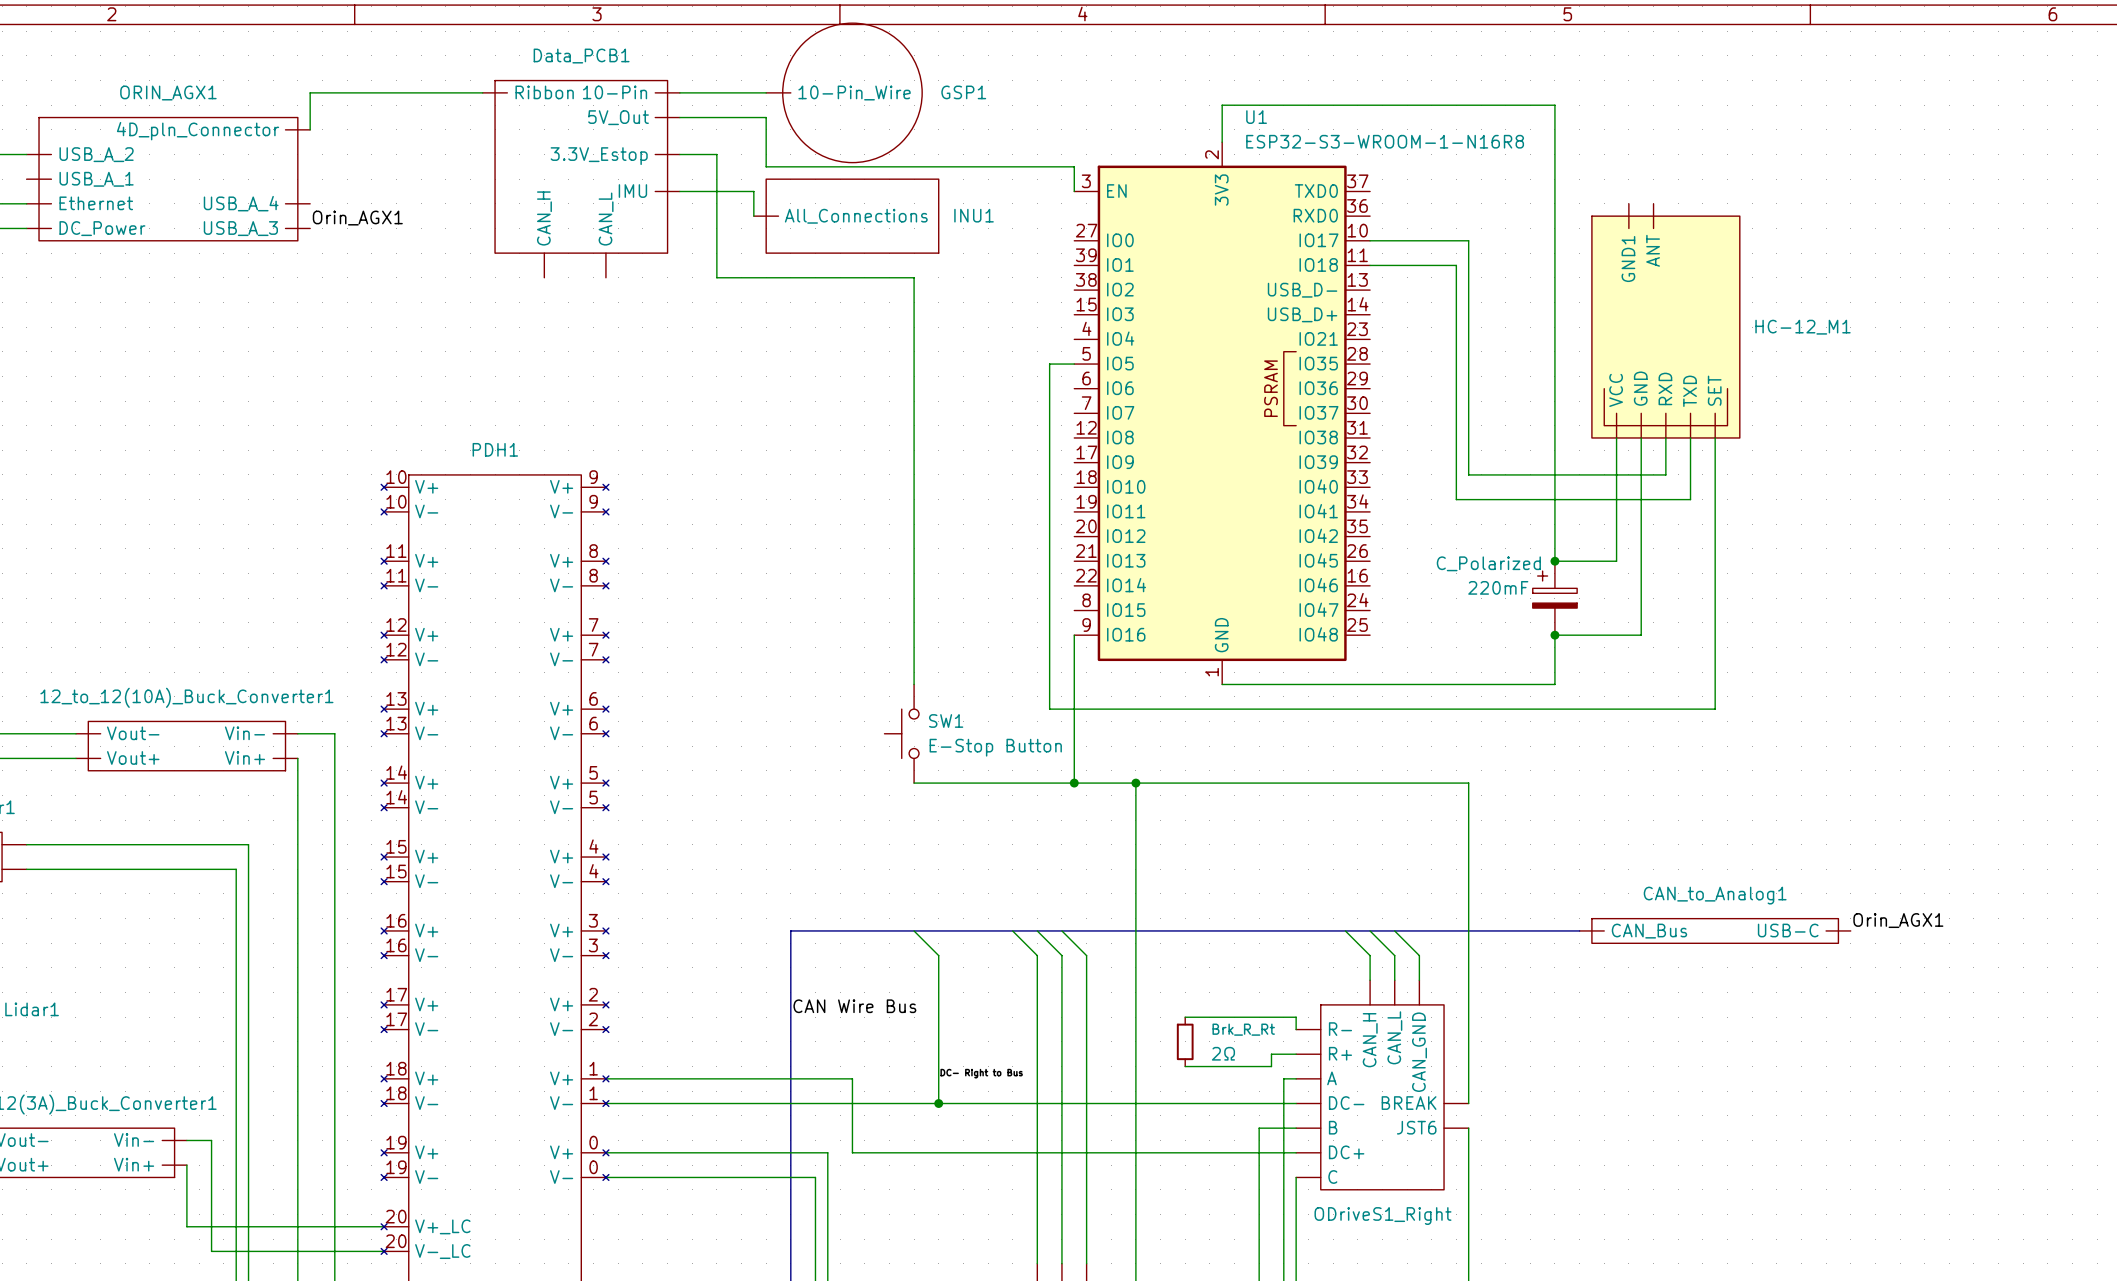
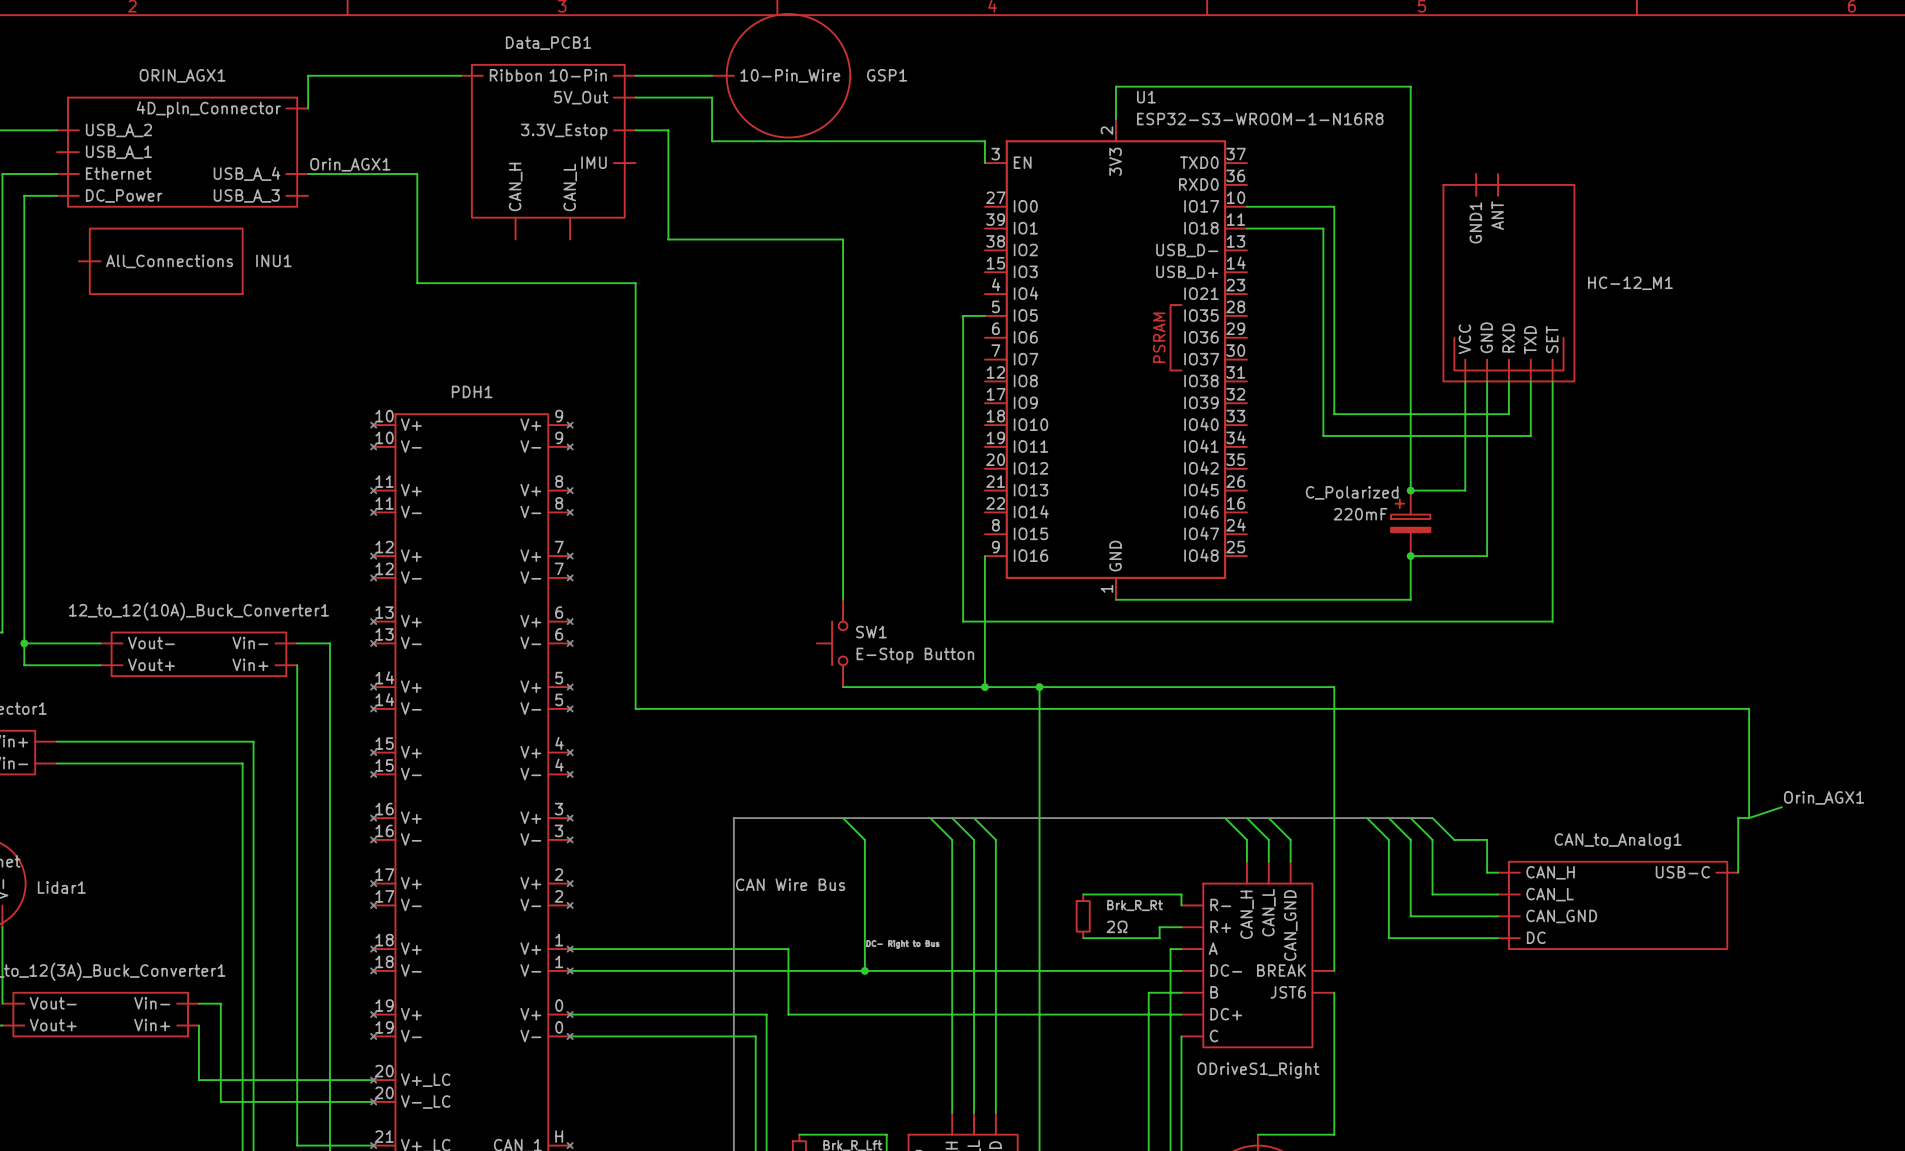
wire: (679, 191) (753, 191) (753, 216) -> none
wire: none -> (308, 174) (417, 174) (417, 283) (635, 283) (635, 708) (1749, 708) (1749, 818)
INU1 position: (846, 216) -> (160, 261)
label position: Orin_AGX1 (357, 218) -> Orin_AGX1 (350, 164)
CAN_to_Analog1 name position: CAN_to_Analog1 (1715, 895) -> CAN_to_Analog1 (1618, 841)
CAN_to_Analog1 symbol: [1579, 918, 1851, 944] -> [1498, 861, 1739, 950]
wire: none -> (1781, 807) (1749, 818)
label position: Orin_AGX1 (1898, 920) -> Orin_AGX1 (1824, 797)
wire: none -> (1367, 818) (1388, 839) (1388, 938) (1498, 938)
wire: none -> (1388, 818) (1410, 839) (1410, 916) (1498, 916)
wire: none -> (1410, 818) (1432, 839) (1432, 894) (1498, 894)
wire: none -> (1432, 818) (1454, 839) (1487, 839) (1487, 872) (1498, 872)
wire: none -> (1749, 818) (1738, 818) (1738, 872)

